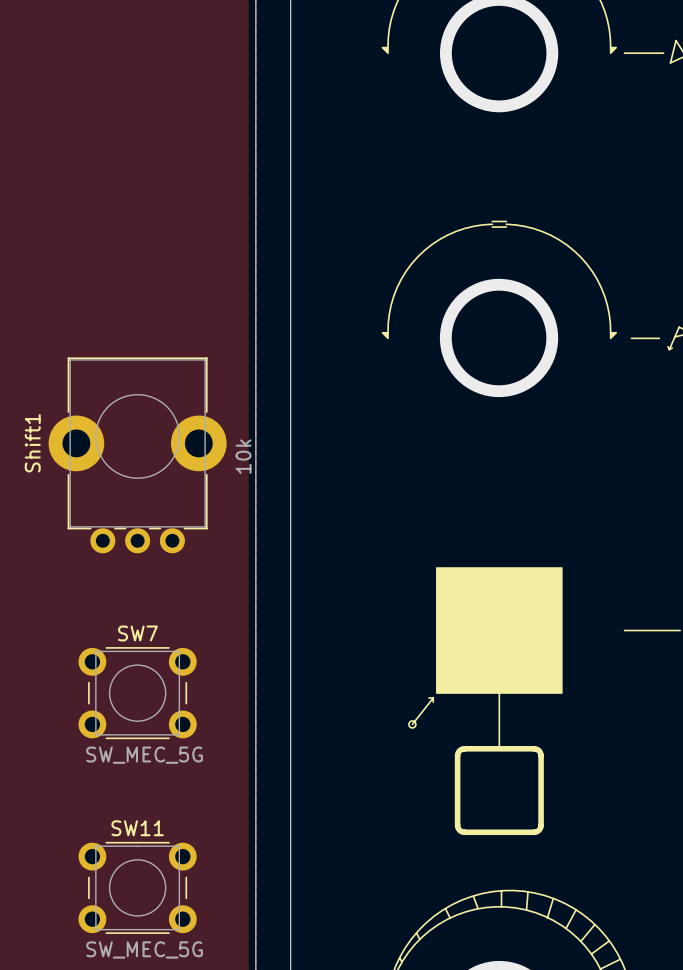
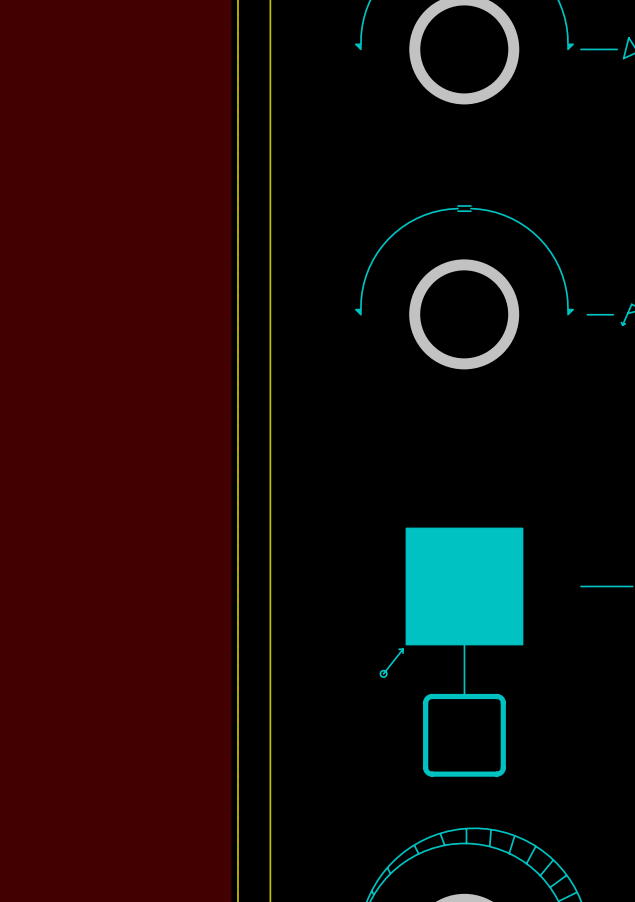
Shift1: 10k (137, 455) -> none
SW7: SW_MEC_5G (137, 693) -> none
SW11: SW_MEC_5G (137, 887) -> none

